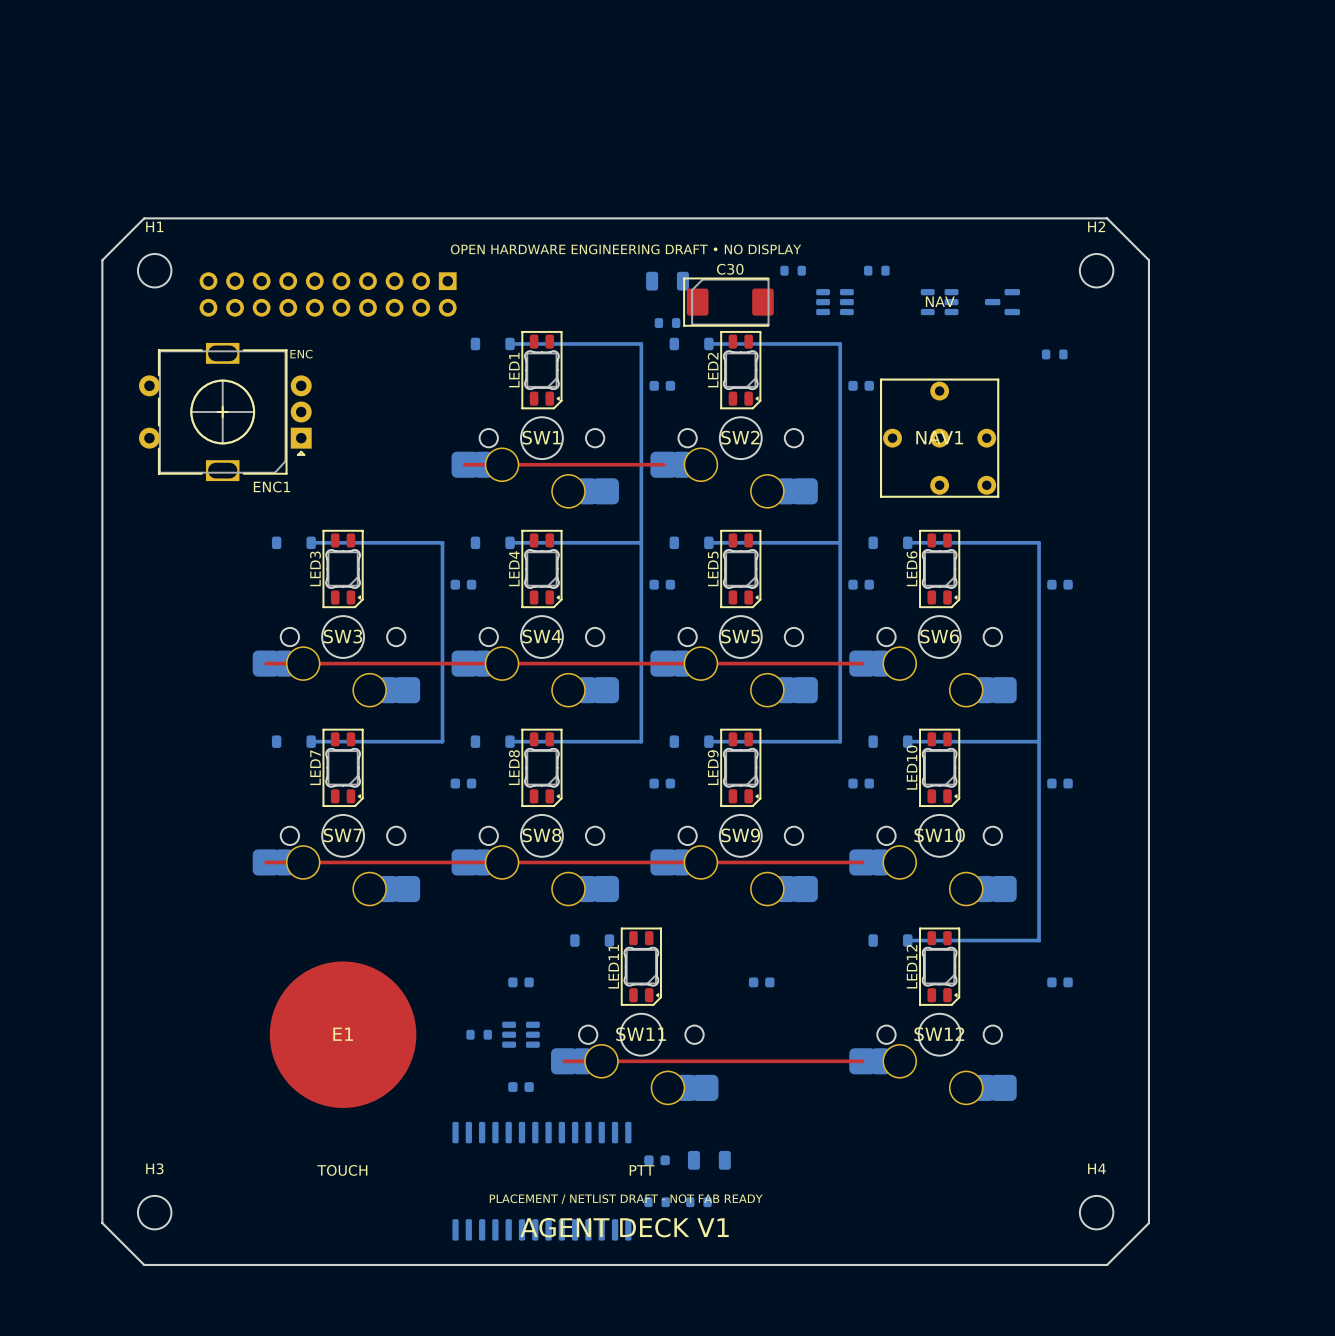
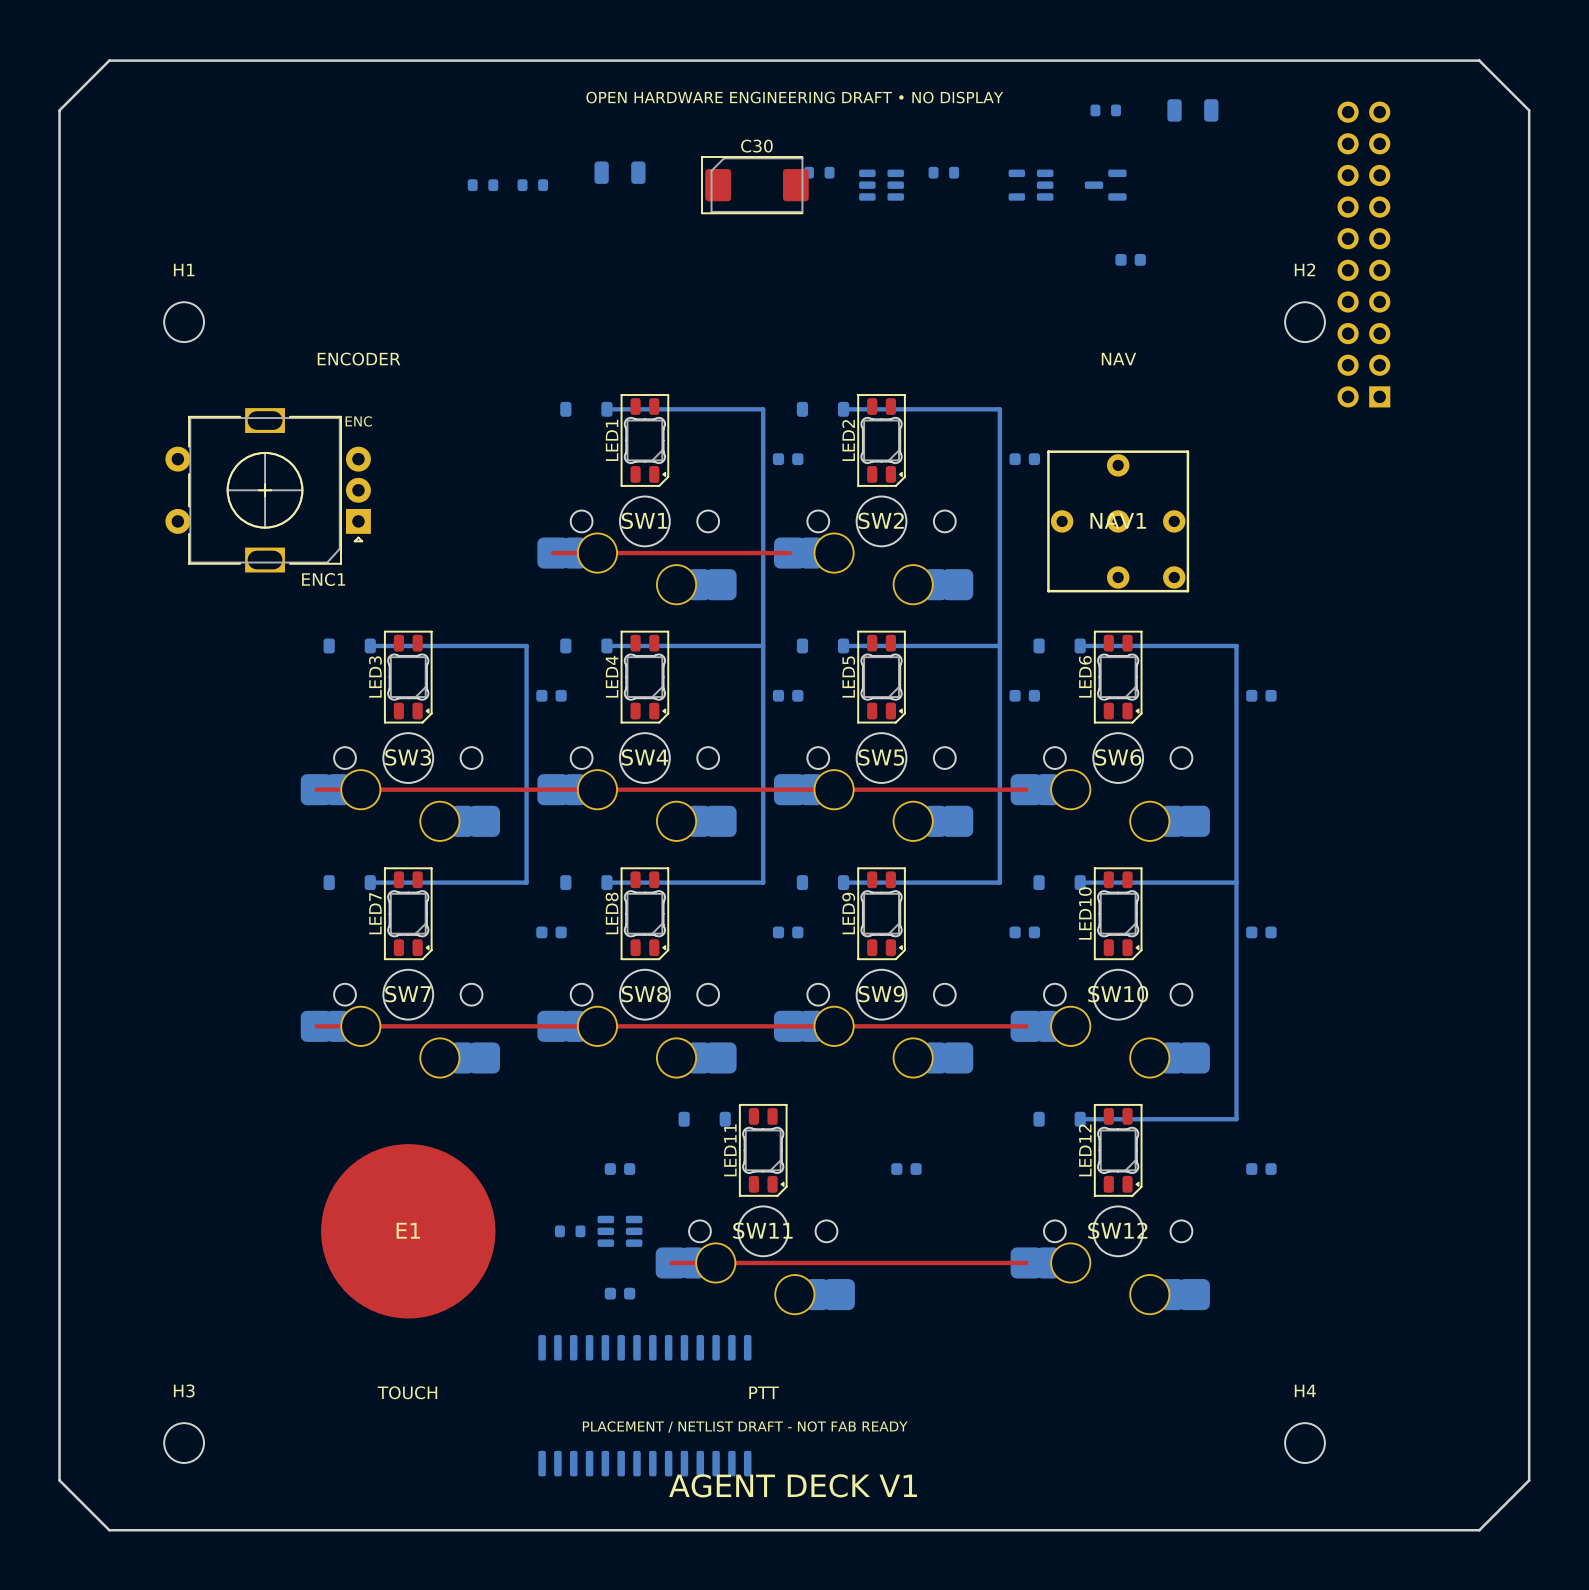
part: none -> (1105, 110)
part: none -> (1192, 110)
part: none -> (620, 172)
part: none -> (819, 172)
part: none -> (943, 172)
part: none -> (483, 185)
part: none -> (532, 185)
part: none -> (1363, 254)
board edge: (144, 218) (102, 260) (102, 1223) (144, 1264) (1107, 1264) (1148, 1223) (1148, 260) (1107, 218) (144, 218) -> (109, 60) (59, 110) (59, 1480) (109, 1530) (1479, 1530) (1529, 1480) (1529, 110) (1479, 60) (109, 60)
part: none -> (1130, 259)
text position: OPEN HARDWARE ENGINEERING DRAFT • NO DISPLAY (626, 249) -> OPEN HARDWARE ENGINEERING DRAFT • NO DISPLAY (794, 97)
part: (793, 270) -> none
part: (876, 270) -> none
part: (667, 281) -> none
part: (328, 294) -> none
text: none -> ENCODER (359, 359)
C30 position: (728, 302) -> (755, 185)
part position: (834, 302) -> (881, 185)
part position: (939, 302) -> (1031, 185)
part position: (1002, 302) -> (1105, 185)
part: (667, 323) -> none
part: (1054, 354) -> none
part: (657, 1160) -> none
part: (709, 1160) -> none
part: (657, 1202) -> none
part: (698, 1202) -> none
text position: AGENT DECK V1 (624, 1227) -> AGENT DECK V1 (793, 1485)

